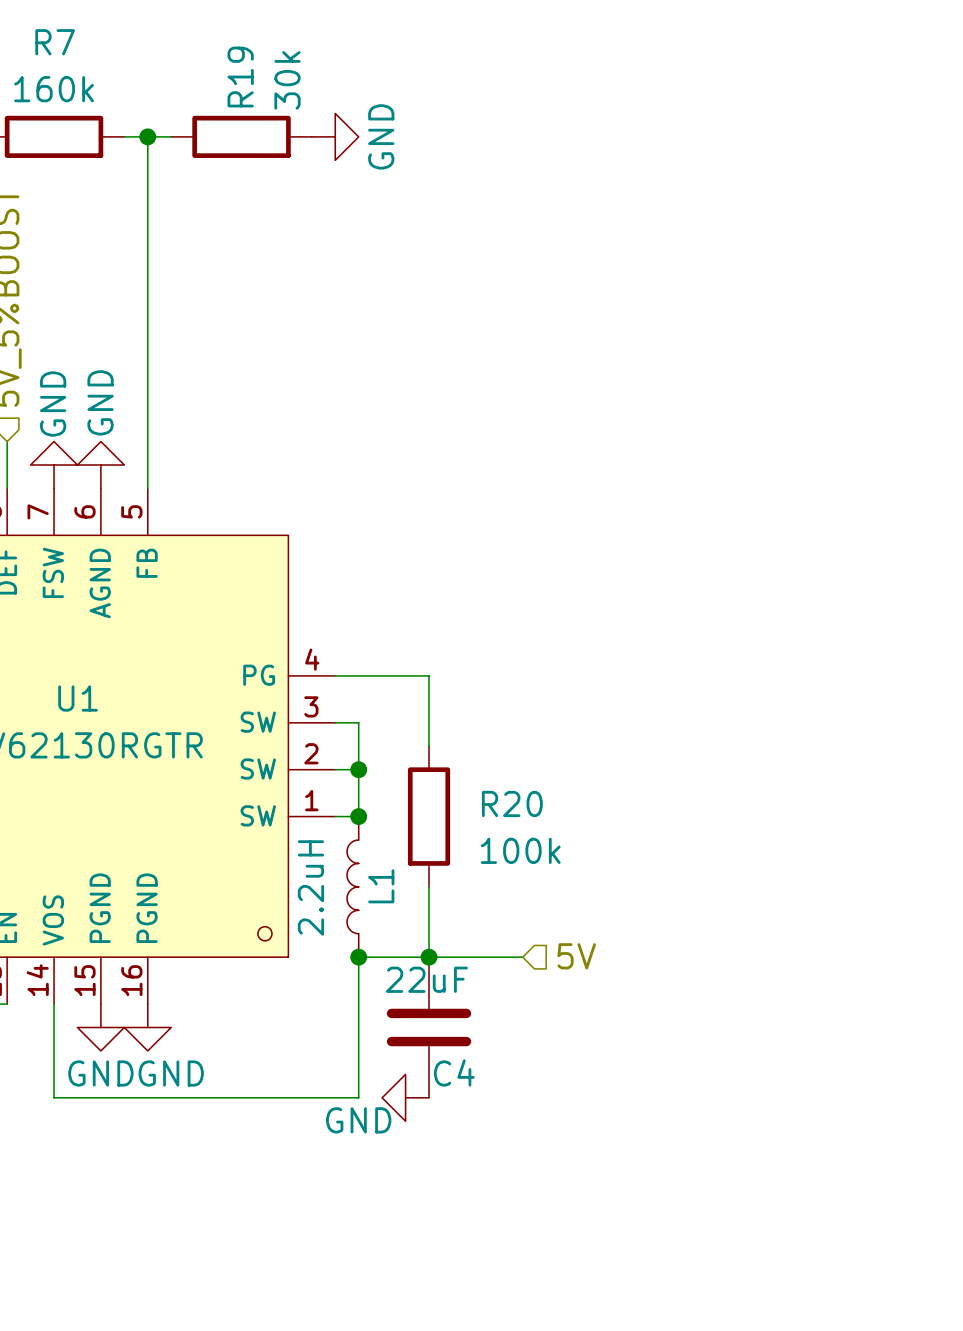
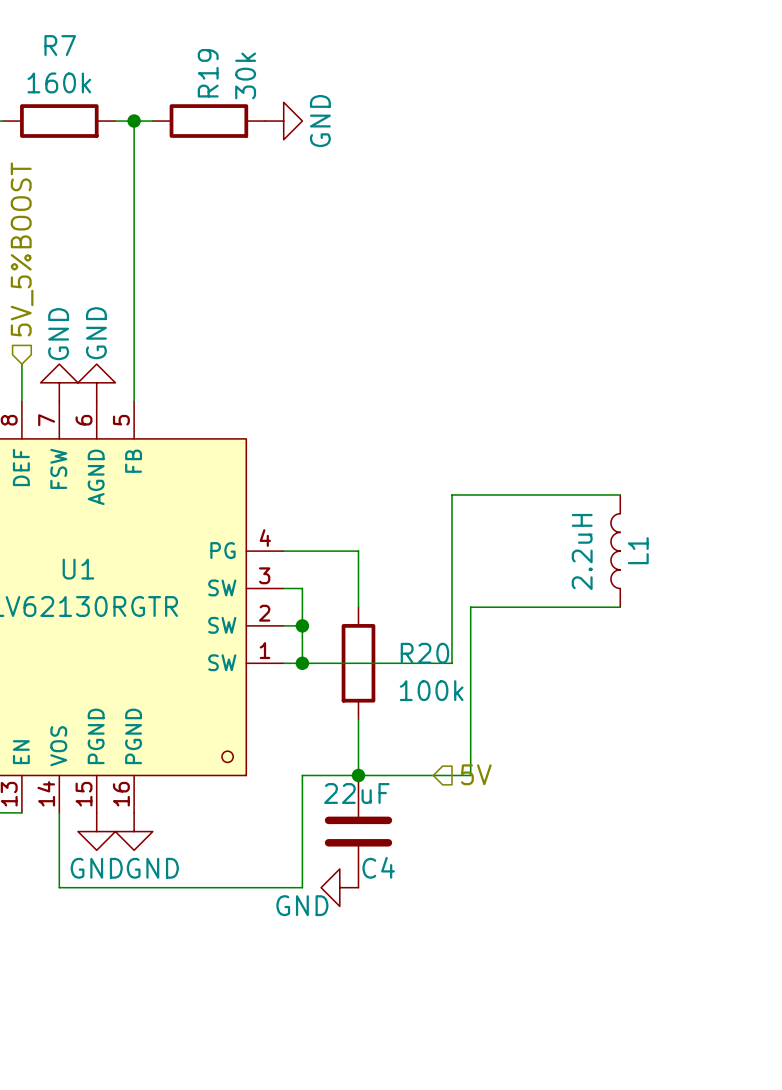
wire: none -> (620, 495) (451, 495) (451, 663) (302, 663)
wire: none -> (620, 607) (470, 607) (470, 775) (433, 775)
L1 position: (352, 886) -> (615, 551)
junction: (358, 957) -> none

